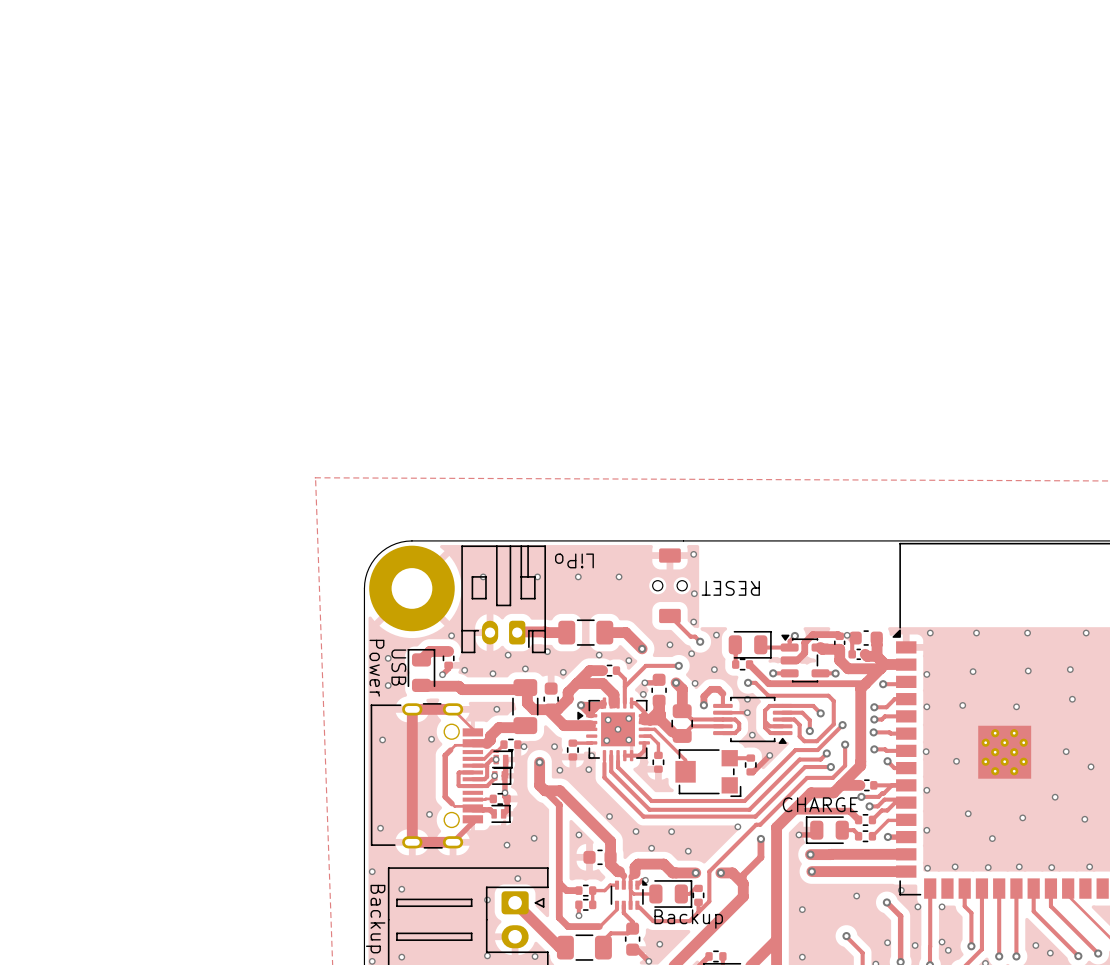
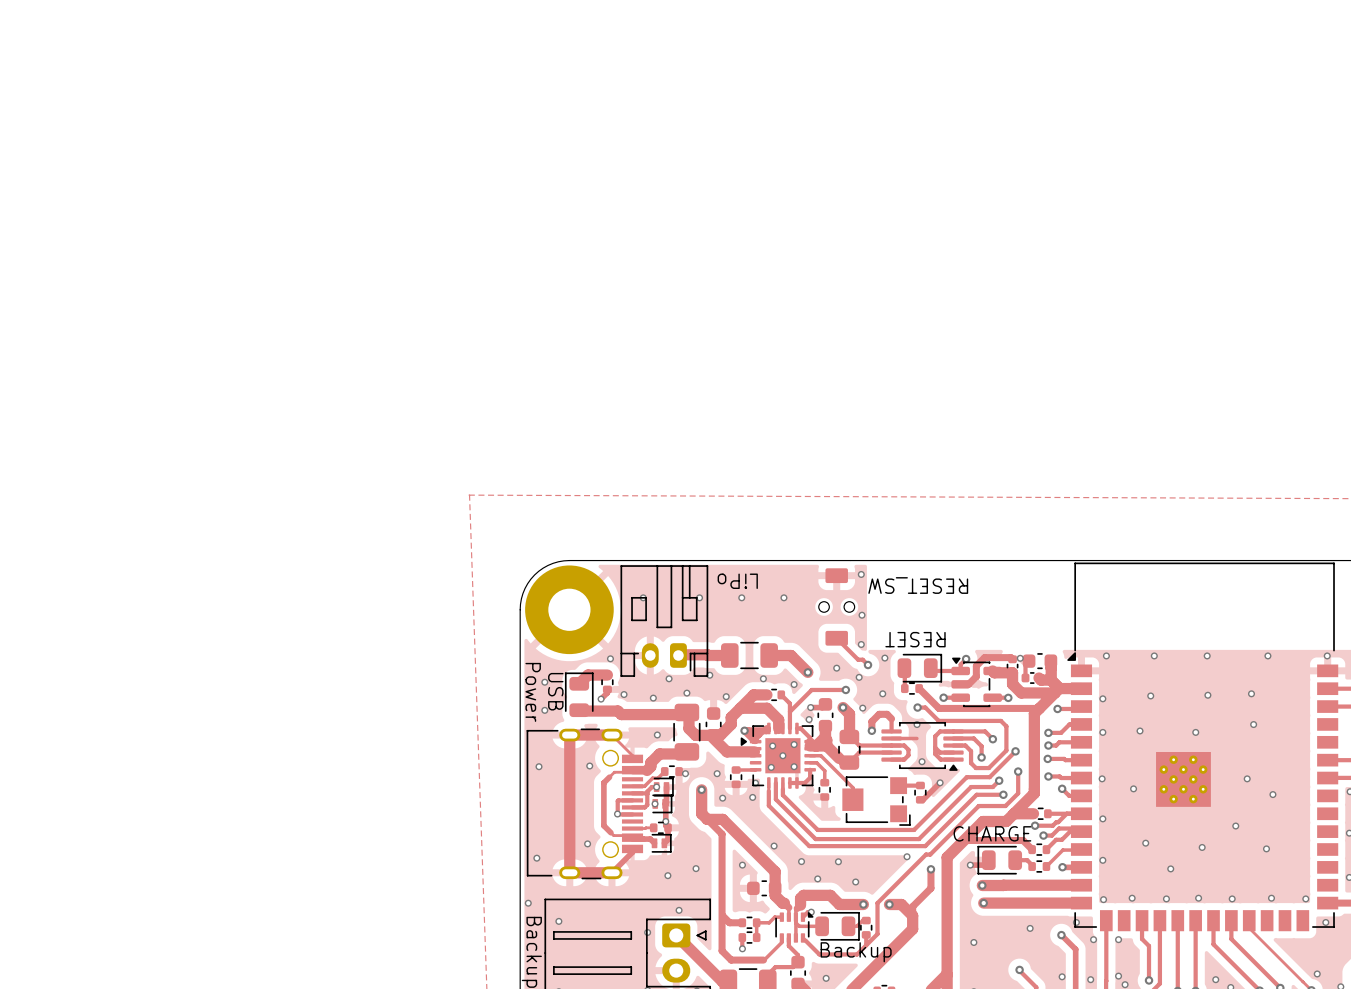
text: none -> RESET_SW (918, 585)
text position: RESET (730, 588) -> RESET (915, 639)
via: (747, 712) -> none
track: (494, 775) (494, 778) (487, 786) (472, 786) -> none
via: none -> (617, 814)

